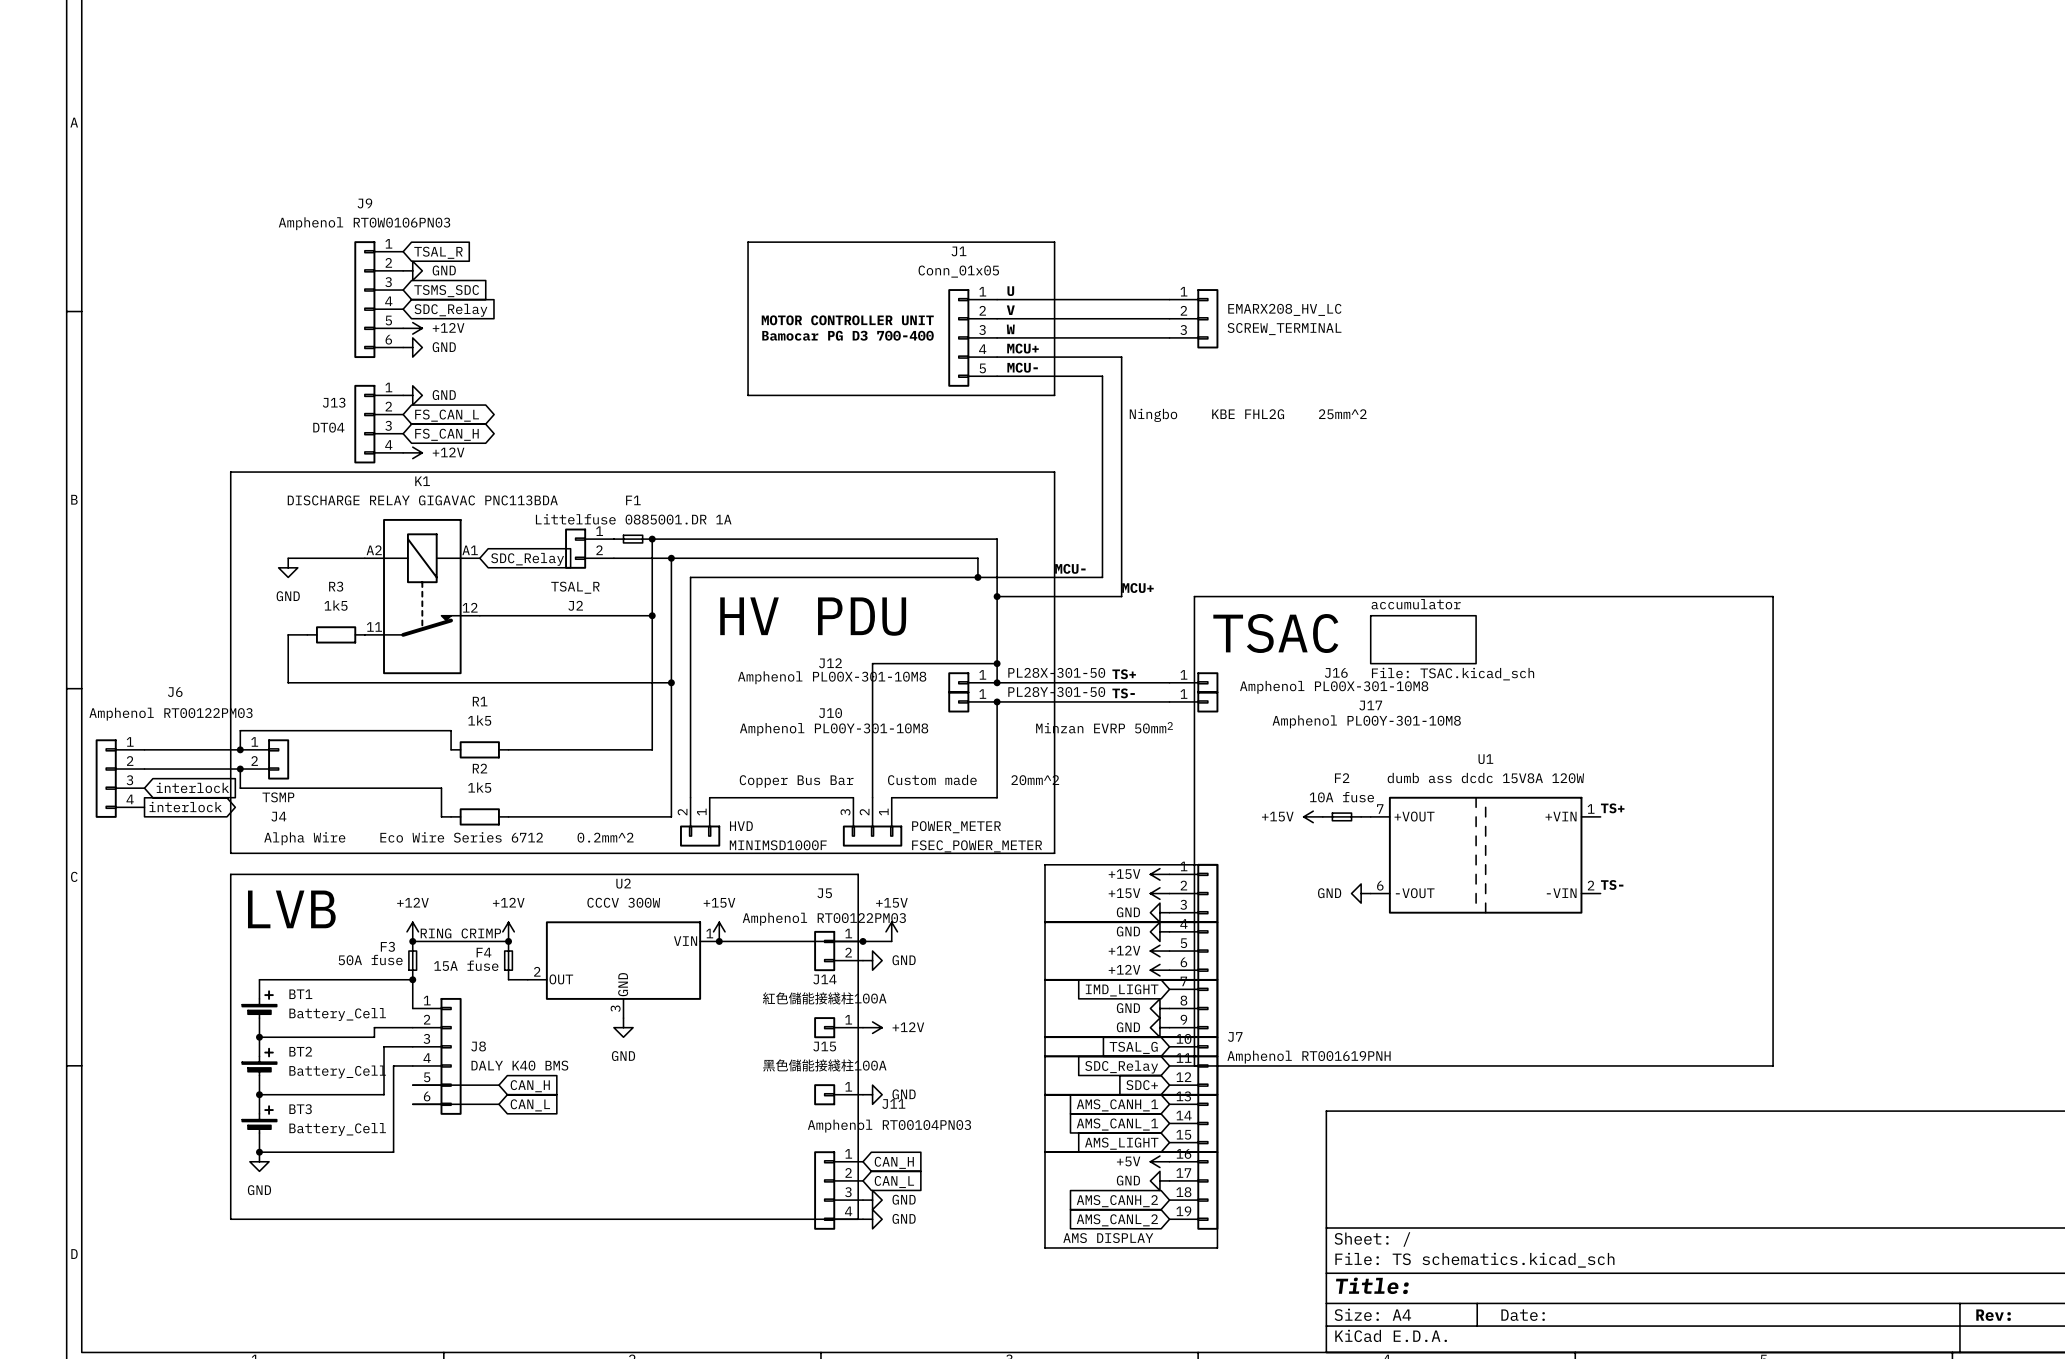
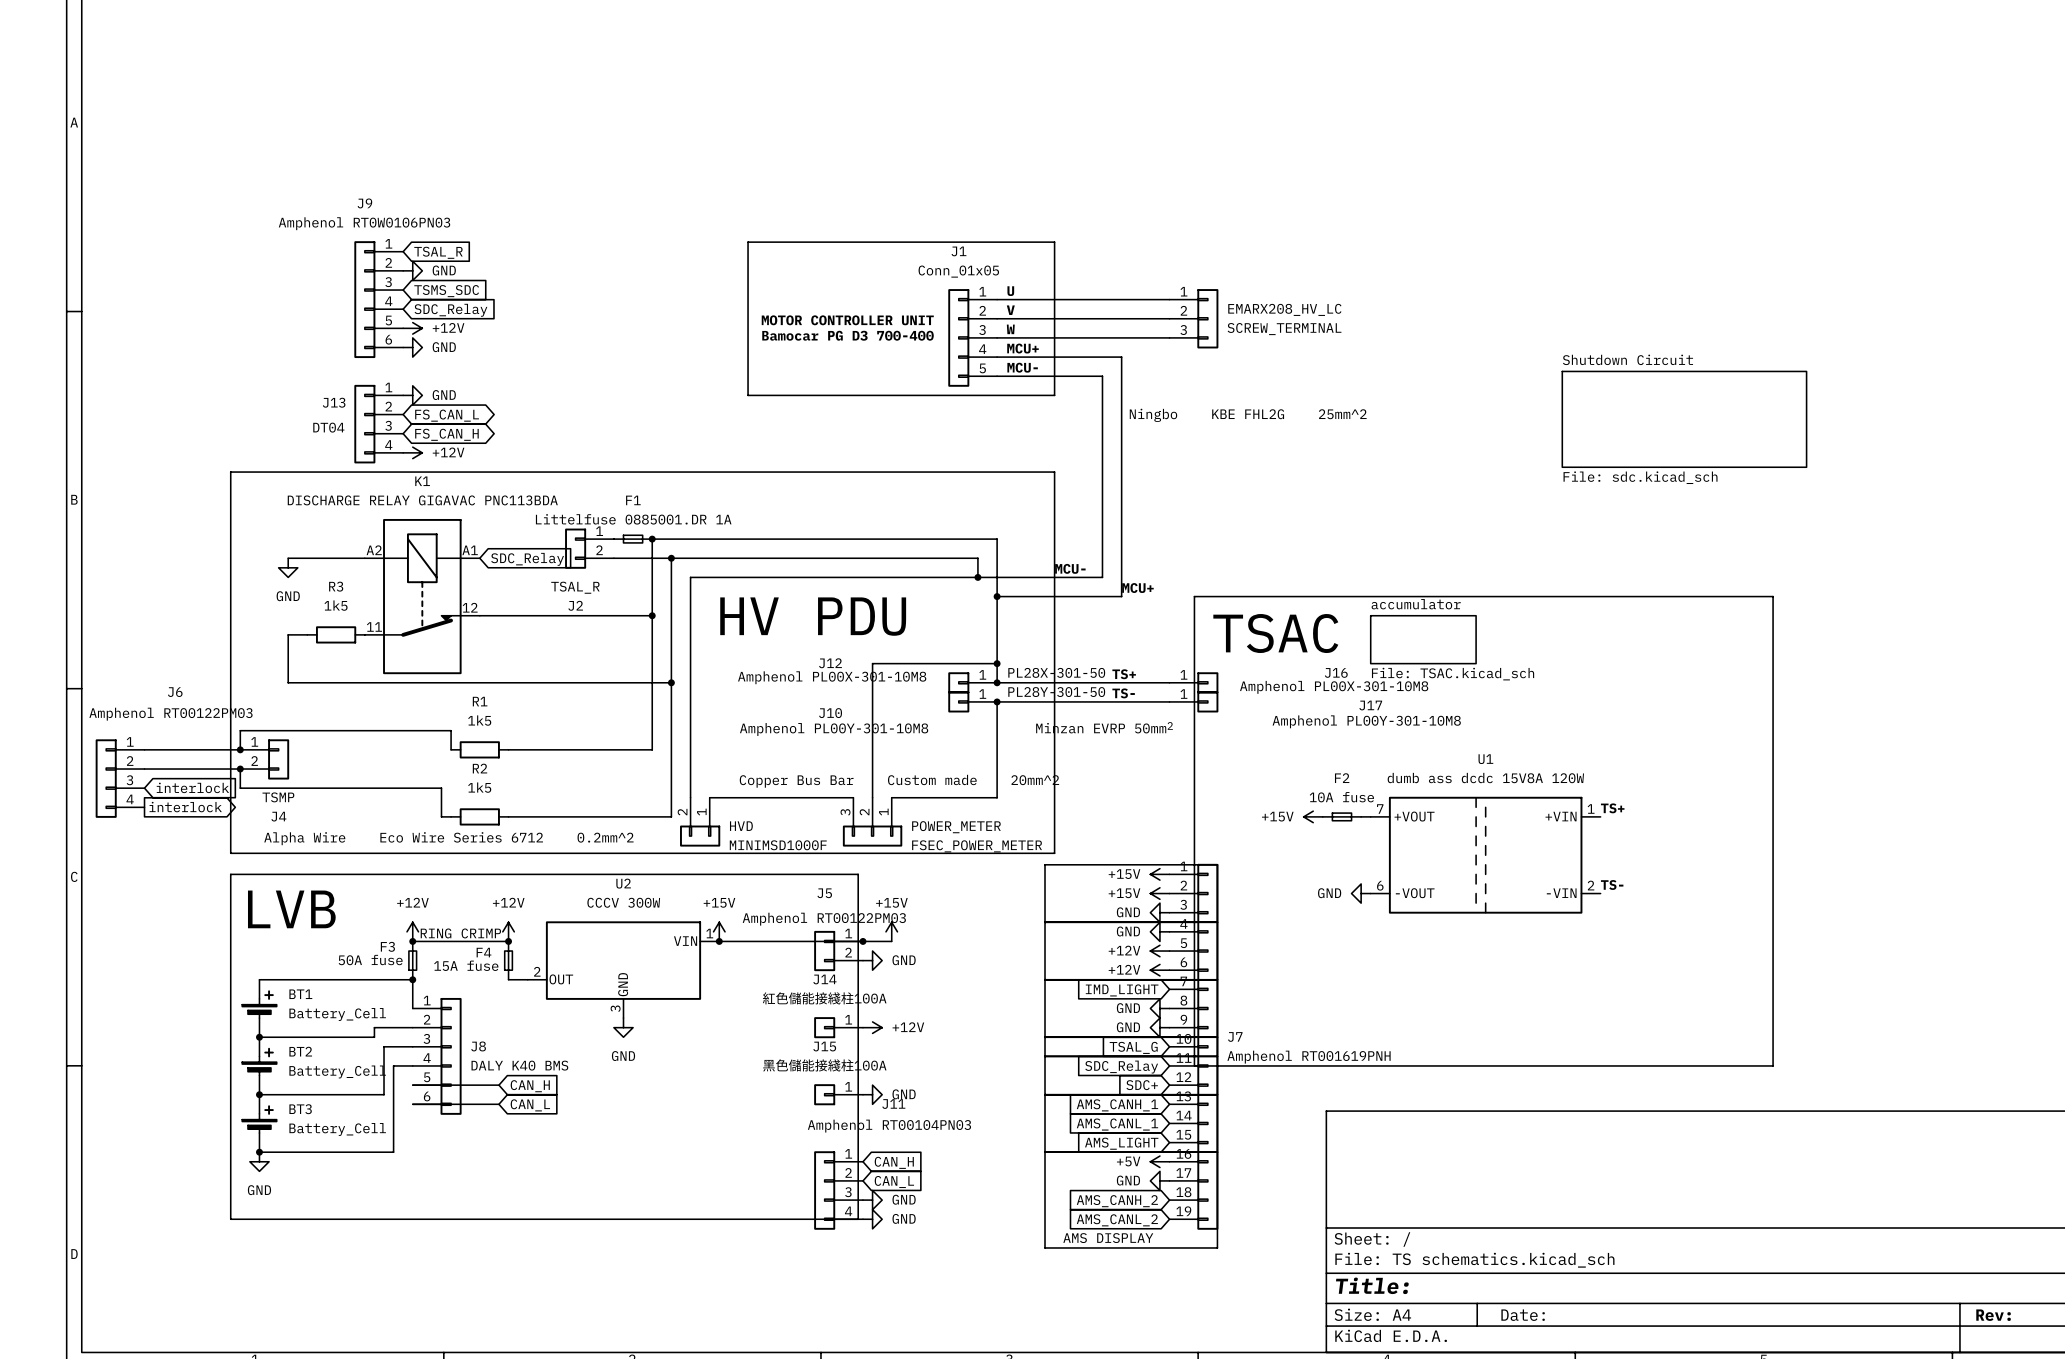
sheet Shutdown Circuit: none -> File: sdc.kicad_sch (1684, 419)

